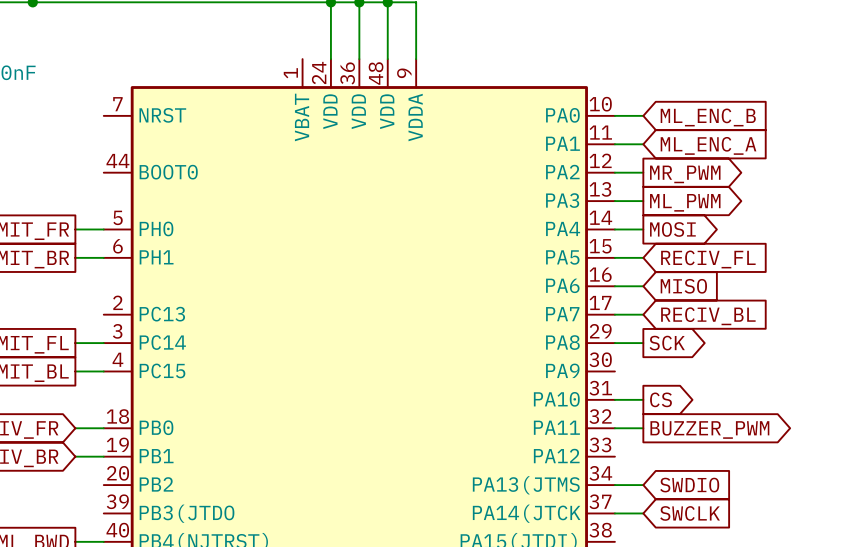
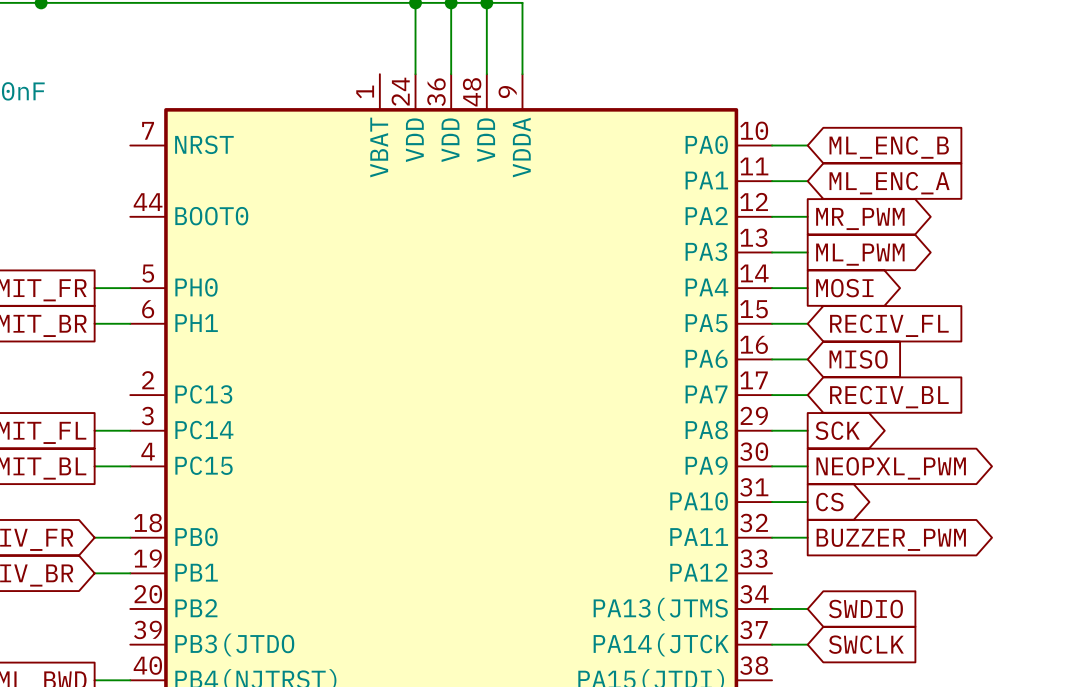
wire: none -> (772, 466) (807, 466)
global label: none -> NEOPXL_PWM (891, 468)

